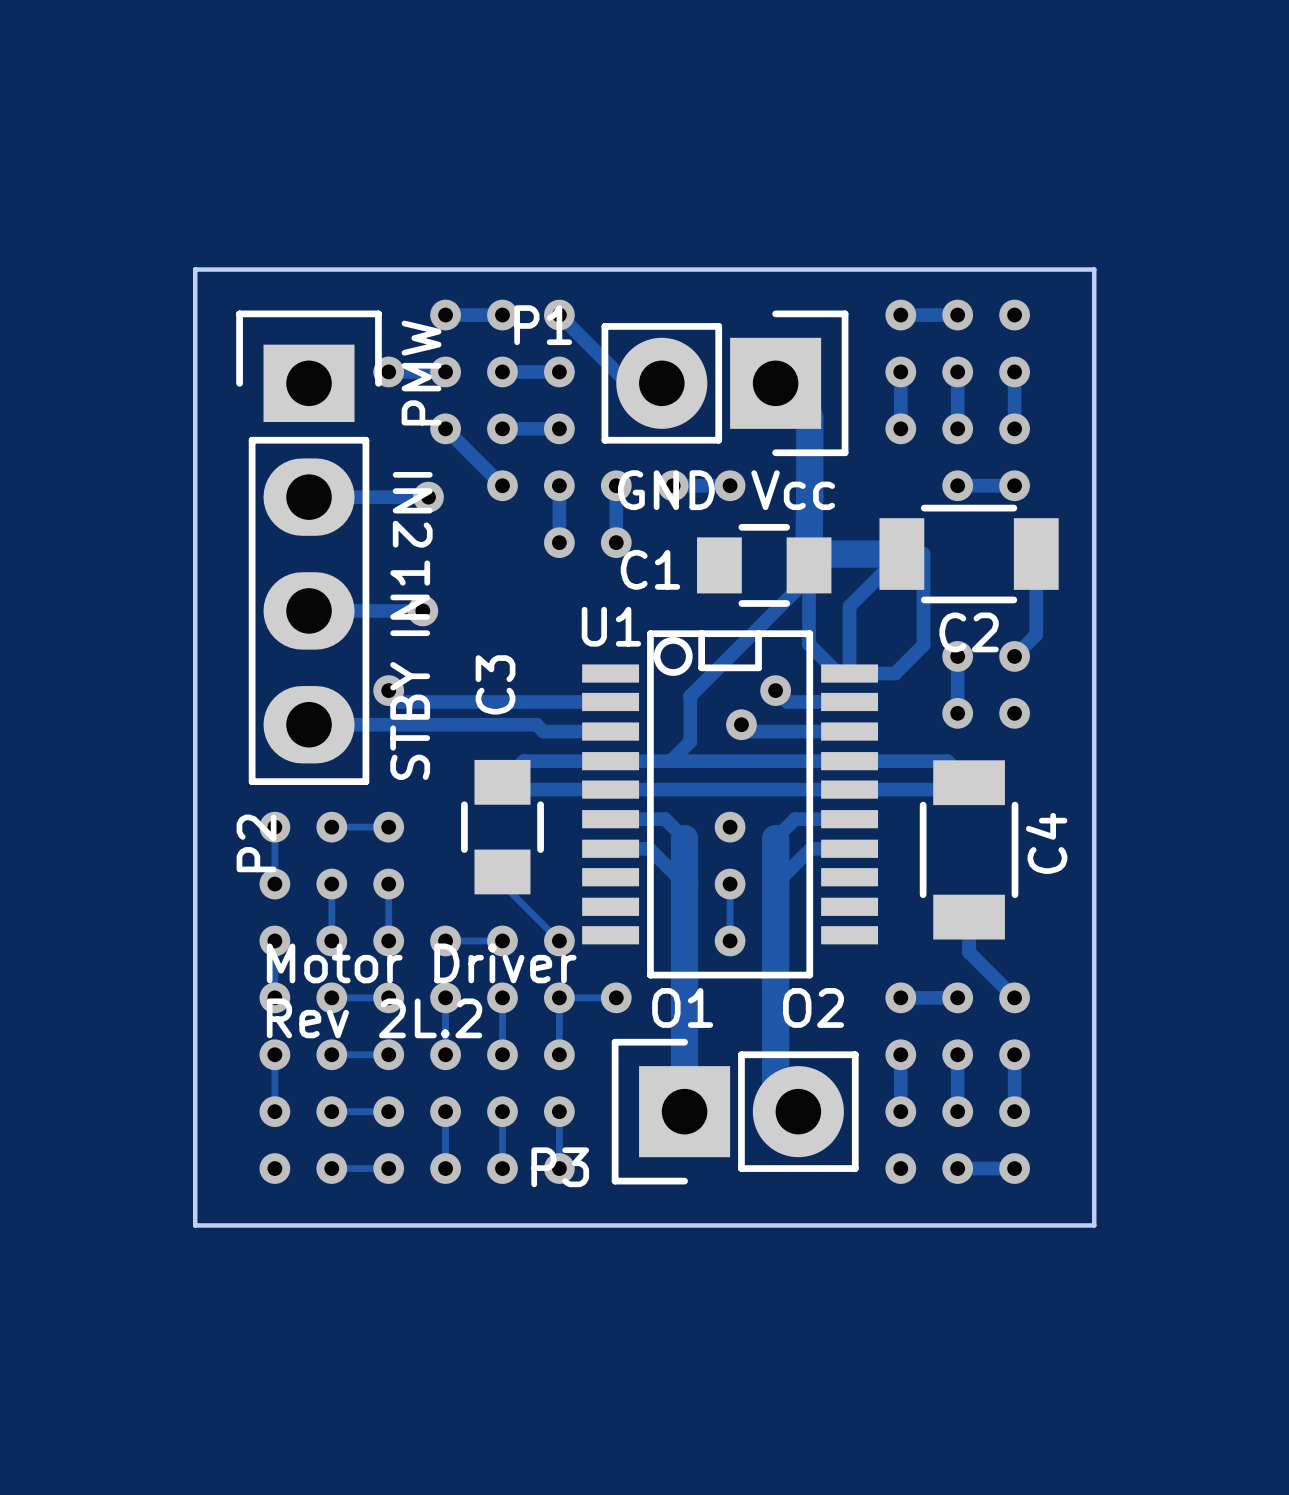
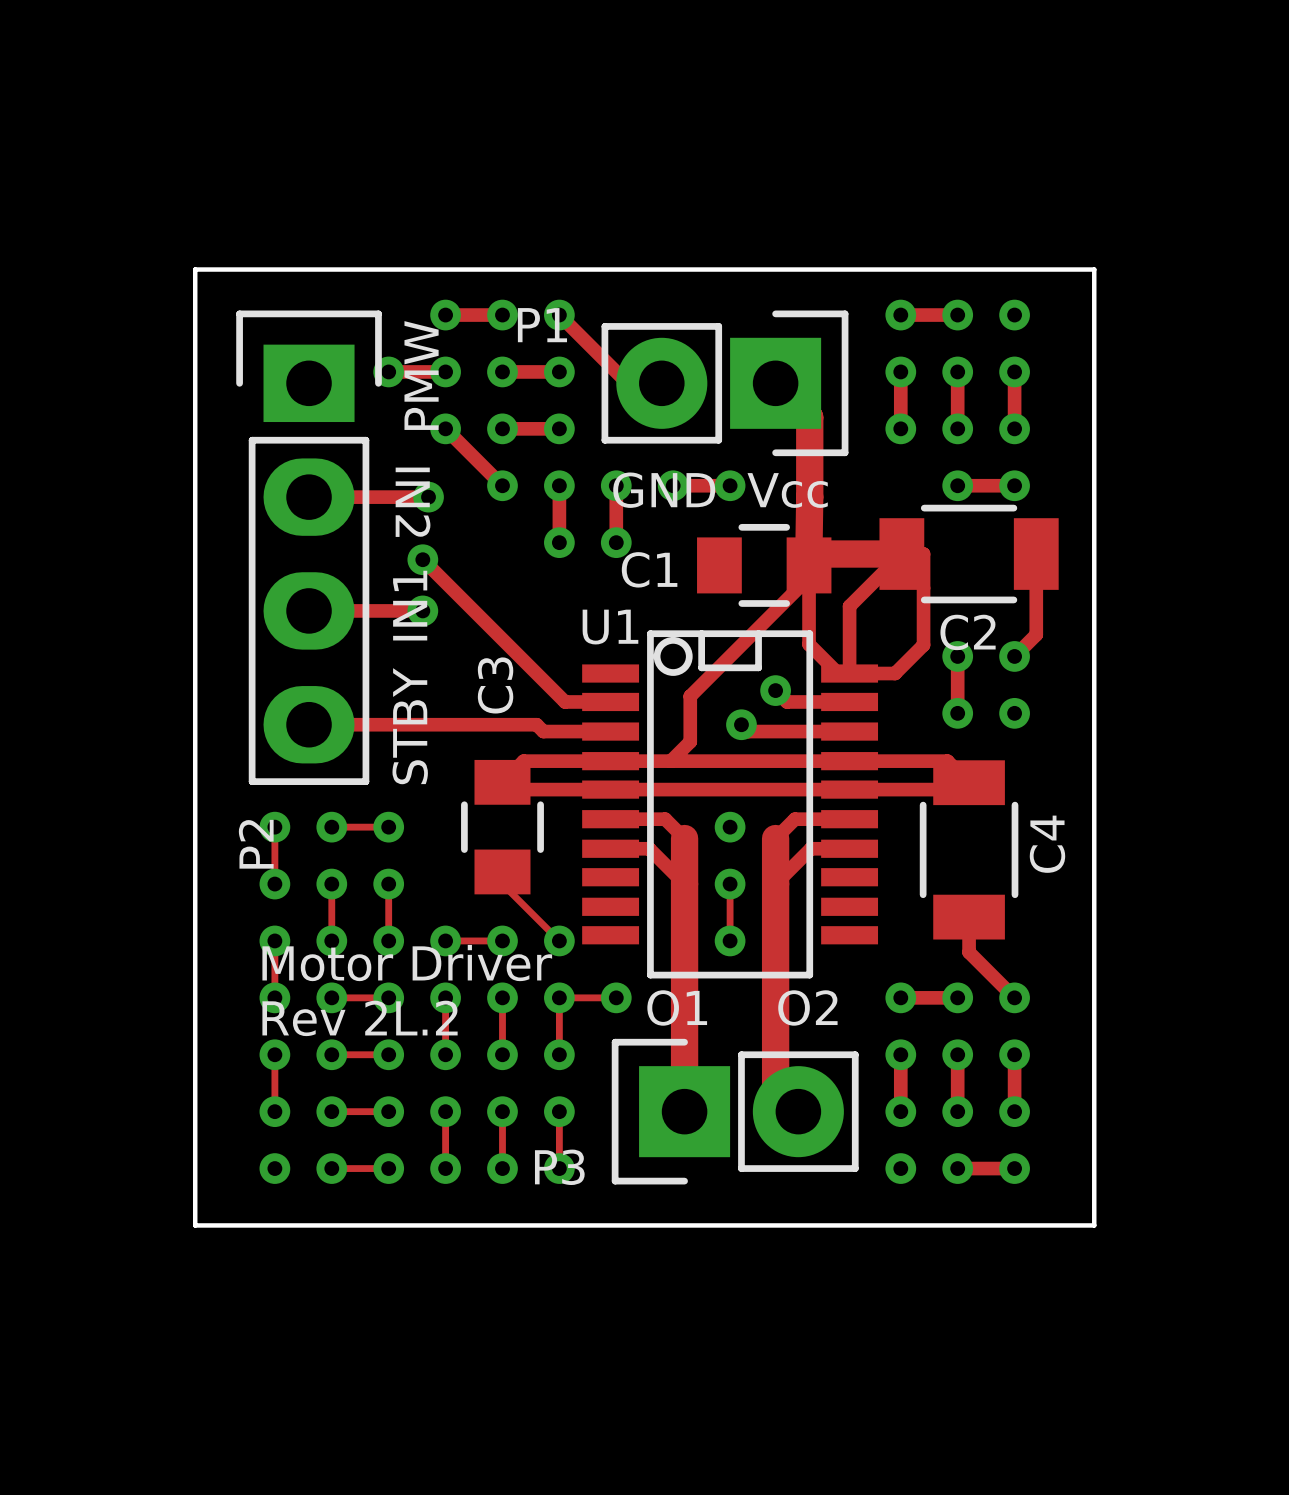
track: (388, 690) (400, 701) (565, 701) -> (422, 559) (565, 701)
via position: (388, 690) -> (422, 559)

